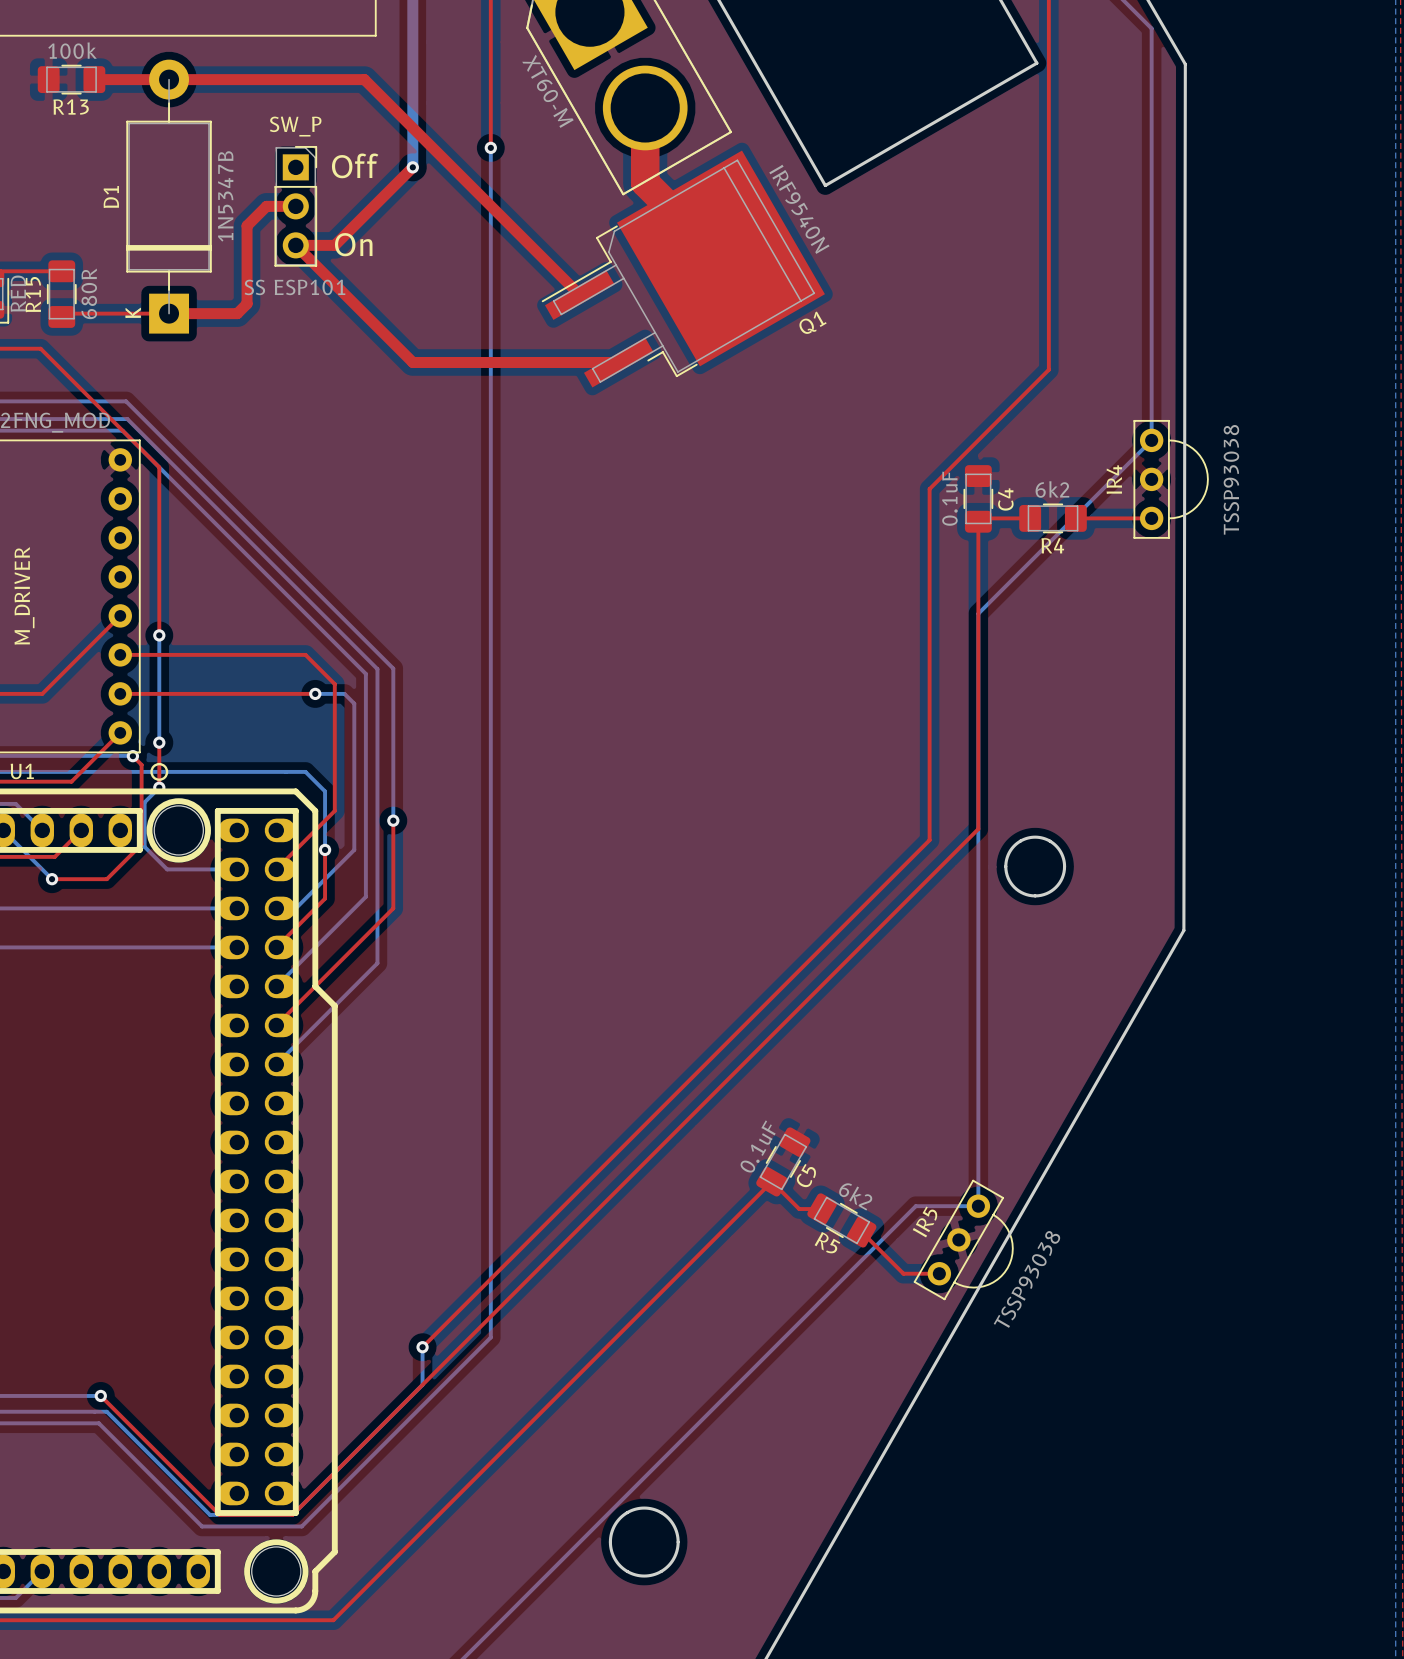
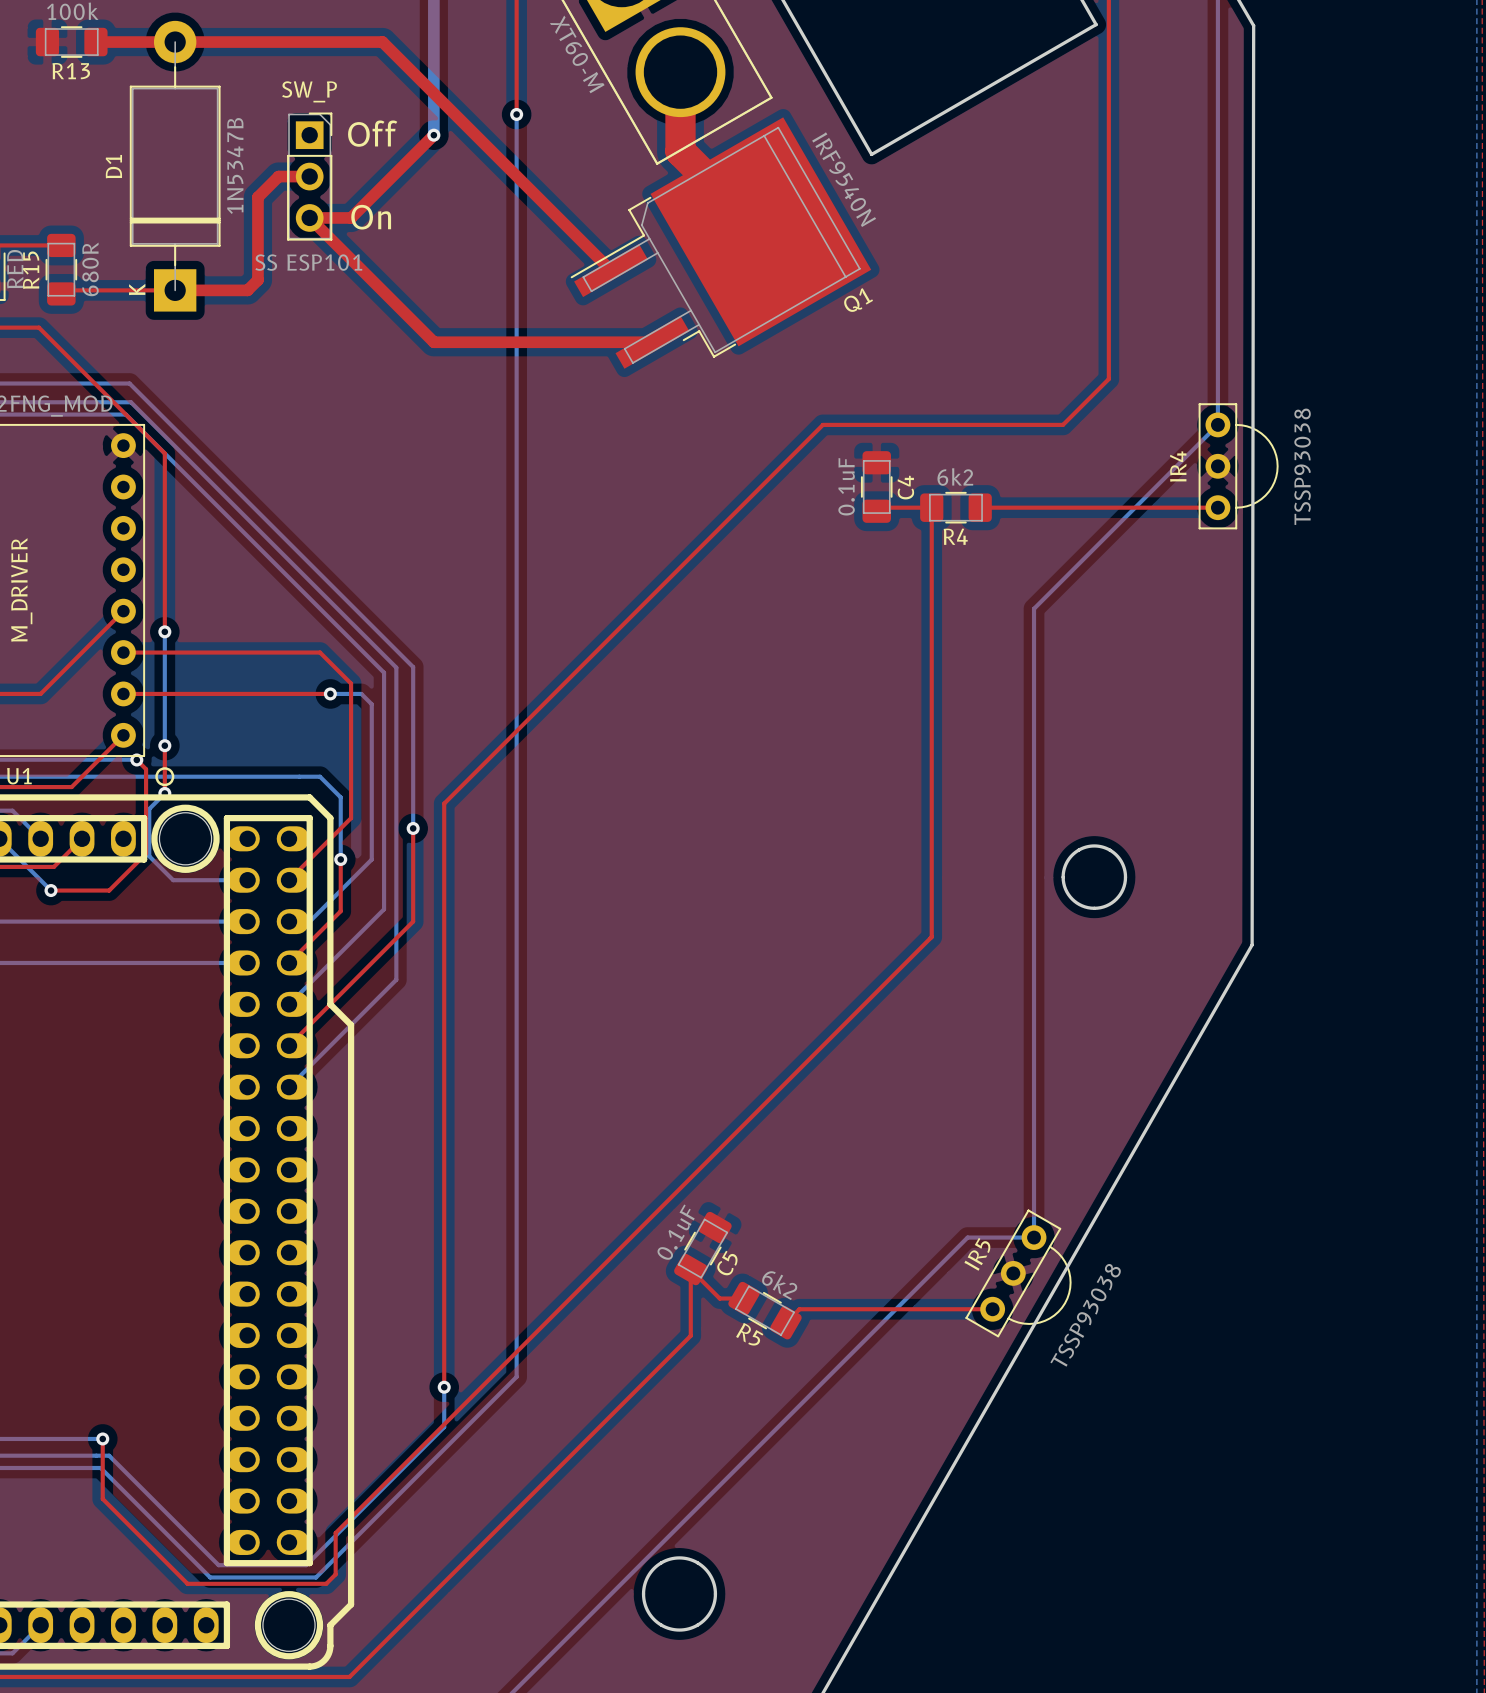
top track: (1048, 369) (929, 489) (929, 840) (422, 1347) -> (1108, 349) (1108, 379) (1063, 424) (822, 424) (444, 803) (444, 1387)
C4 position: (978, 498) -> (876, 486)
top track: none -> (980, 507) (1037, 507)
top track: (981, 518) (978, 521) (978, 829) (292, 1514) (219, 1514) (100, 1395) -> (876, 511) (880, 507) (931, 507) (931, 936) (335, 1533) (335, 1574) (326, 1583) (187, 1583) (102, 1498) (102, 1438)
top track: none -> (1089, 507) (1137, 507)
R4 position: (1053, 518) -> (955, 507)
C5 position: (783, 1161) -> (702, 1248)
top track: (822, 1209) (799, 1209) (771, 1181) (654, 1298) -> (743, 1298) (719, 1298) (690, 1269) (690, 1335)
R5 position: (841, 1220) -> (764, 1310)
top track: (861, 1231) (903, 1273) -> (785, 1322) (799, 1309) (954, 1309)

